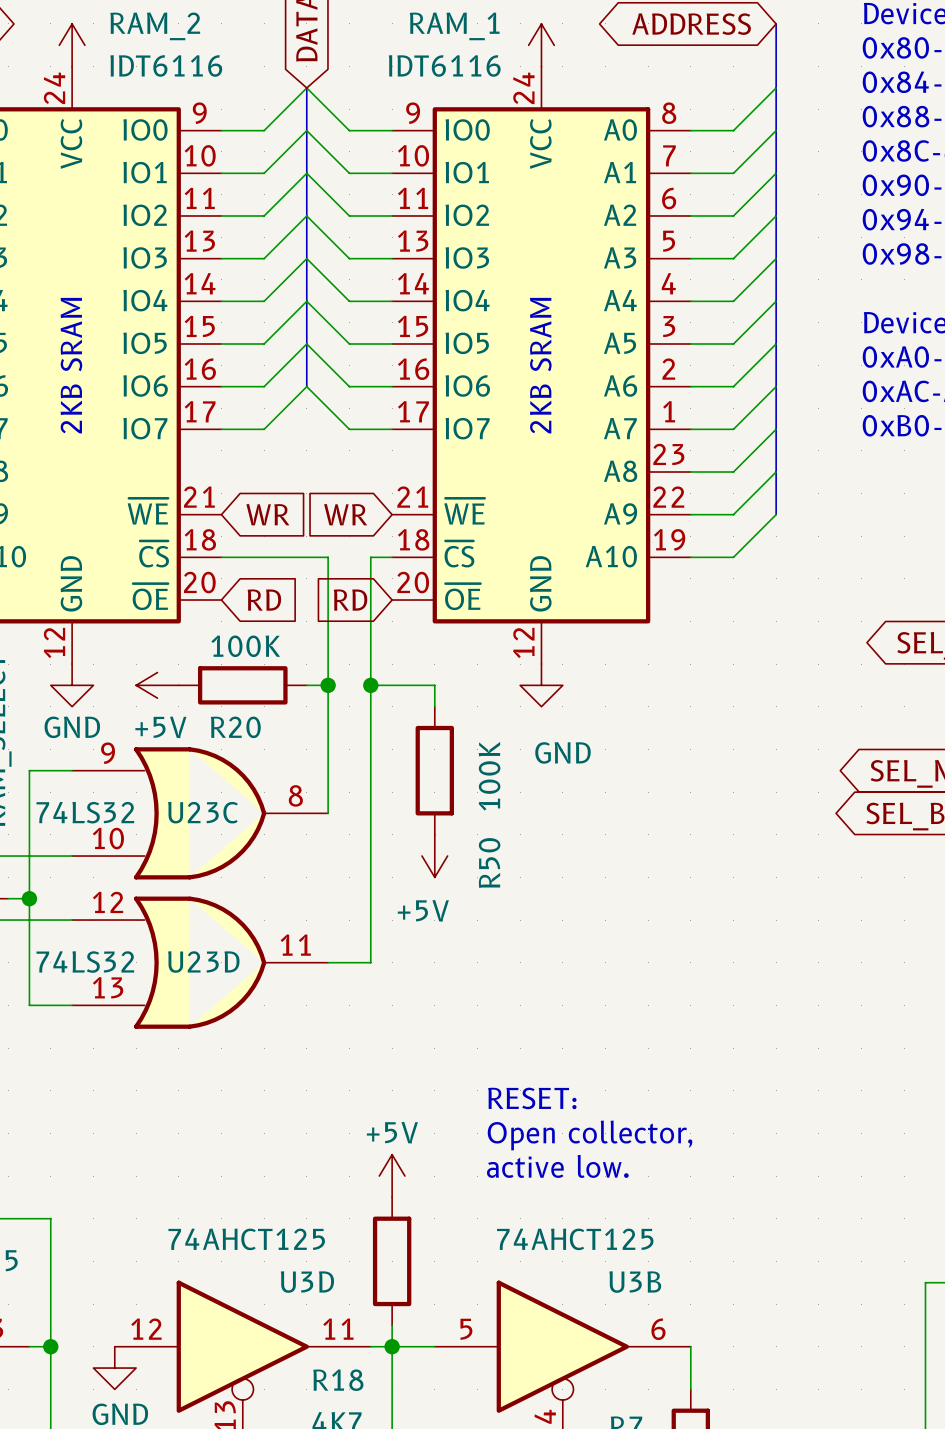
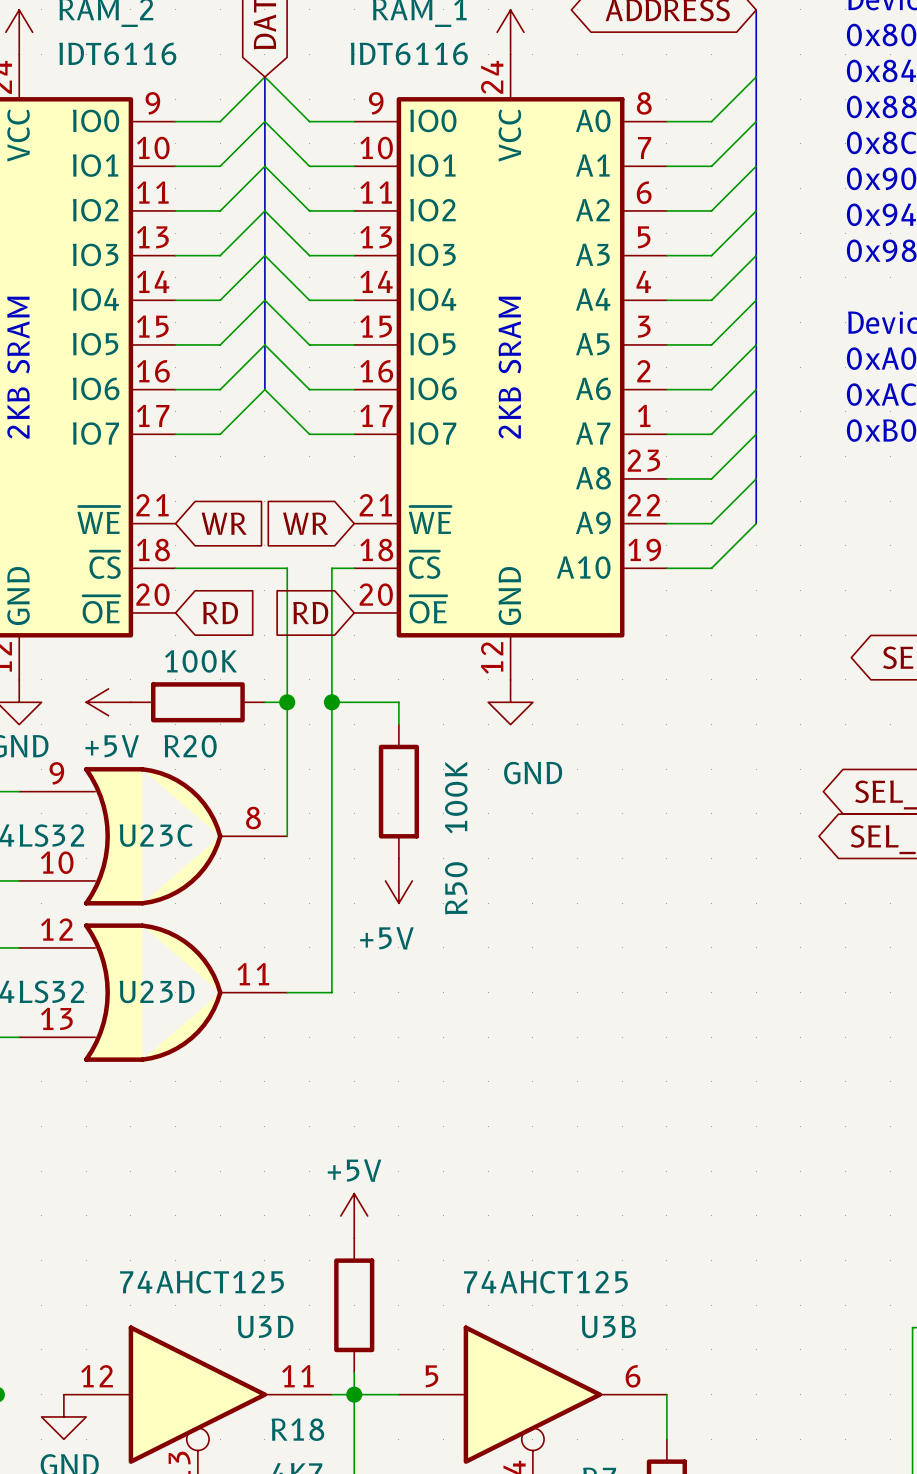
text: RESET: (532, 1098) -> none
text: Open collector, (590, 1135) -> none
text: active low. (557, 1166) -> none

